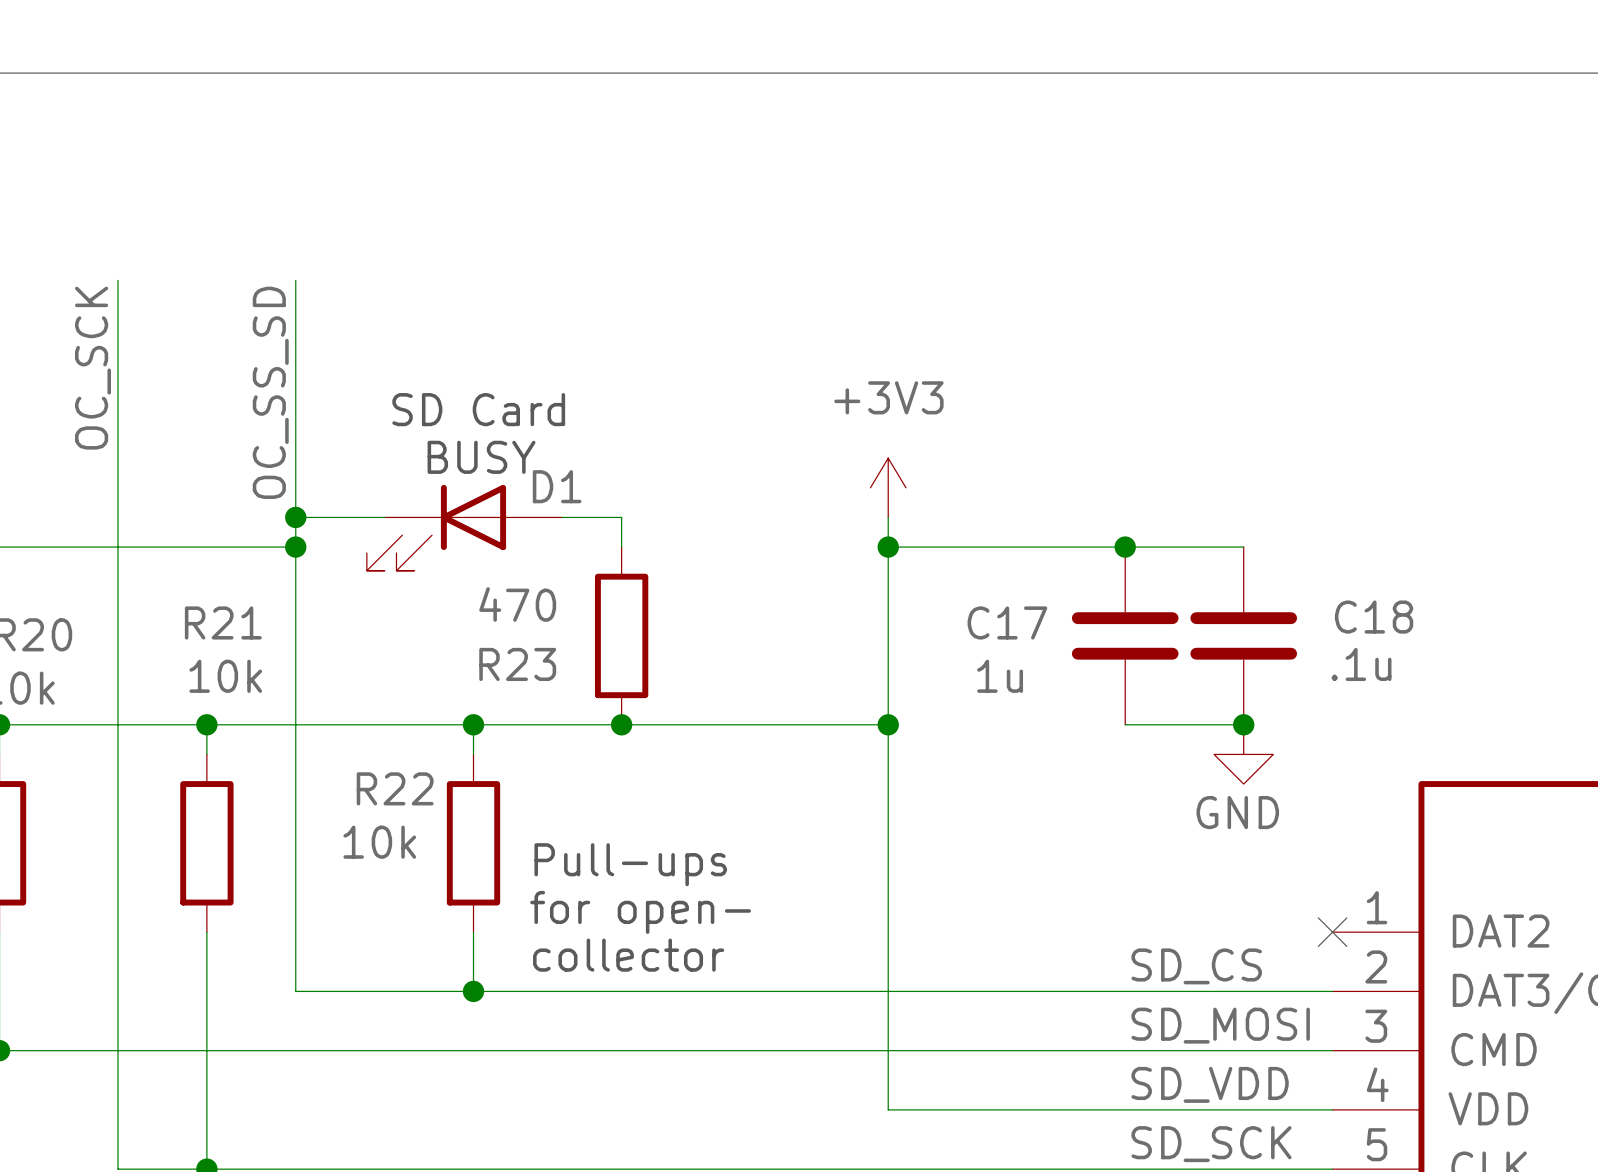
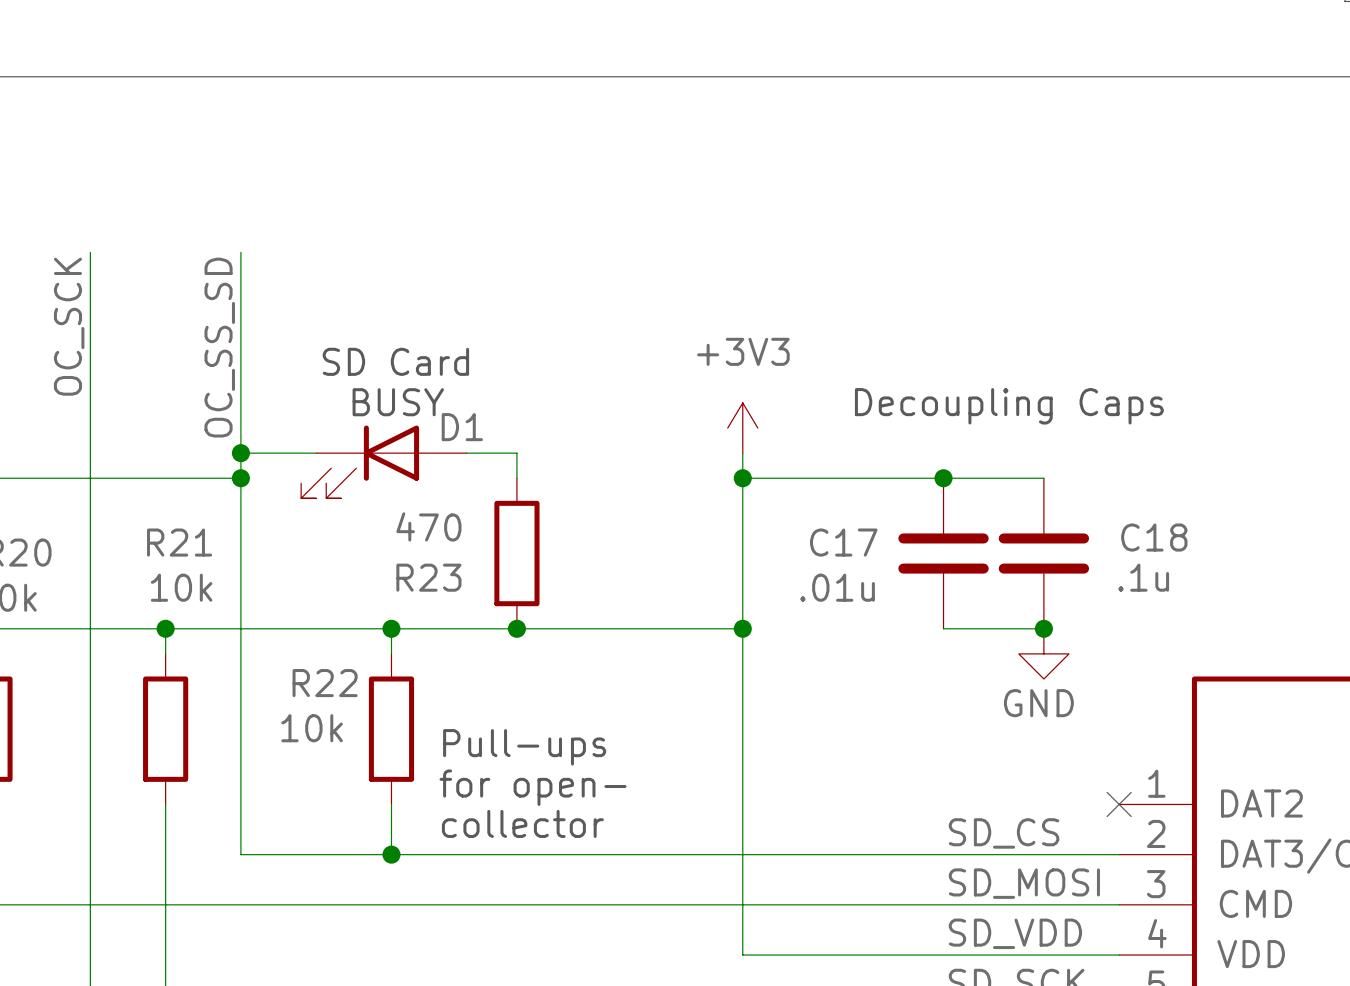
text: none -> Decoupling Caps (1009, 406)
C17 value: 1u (1000, 676) -> .01u (837, 587)

